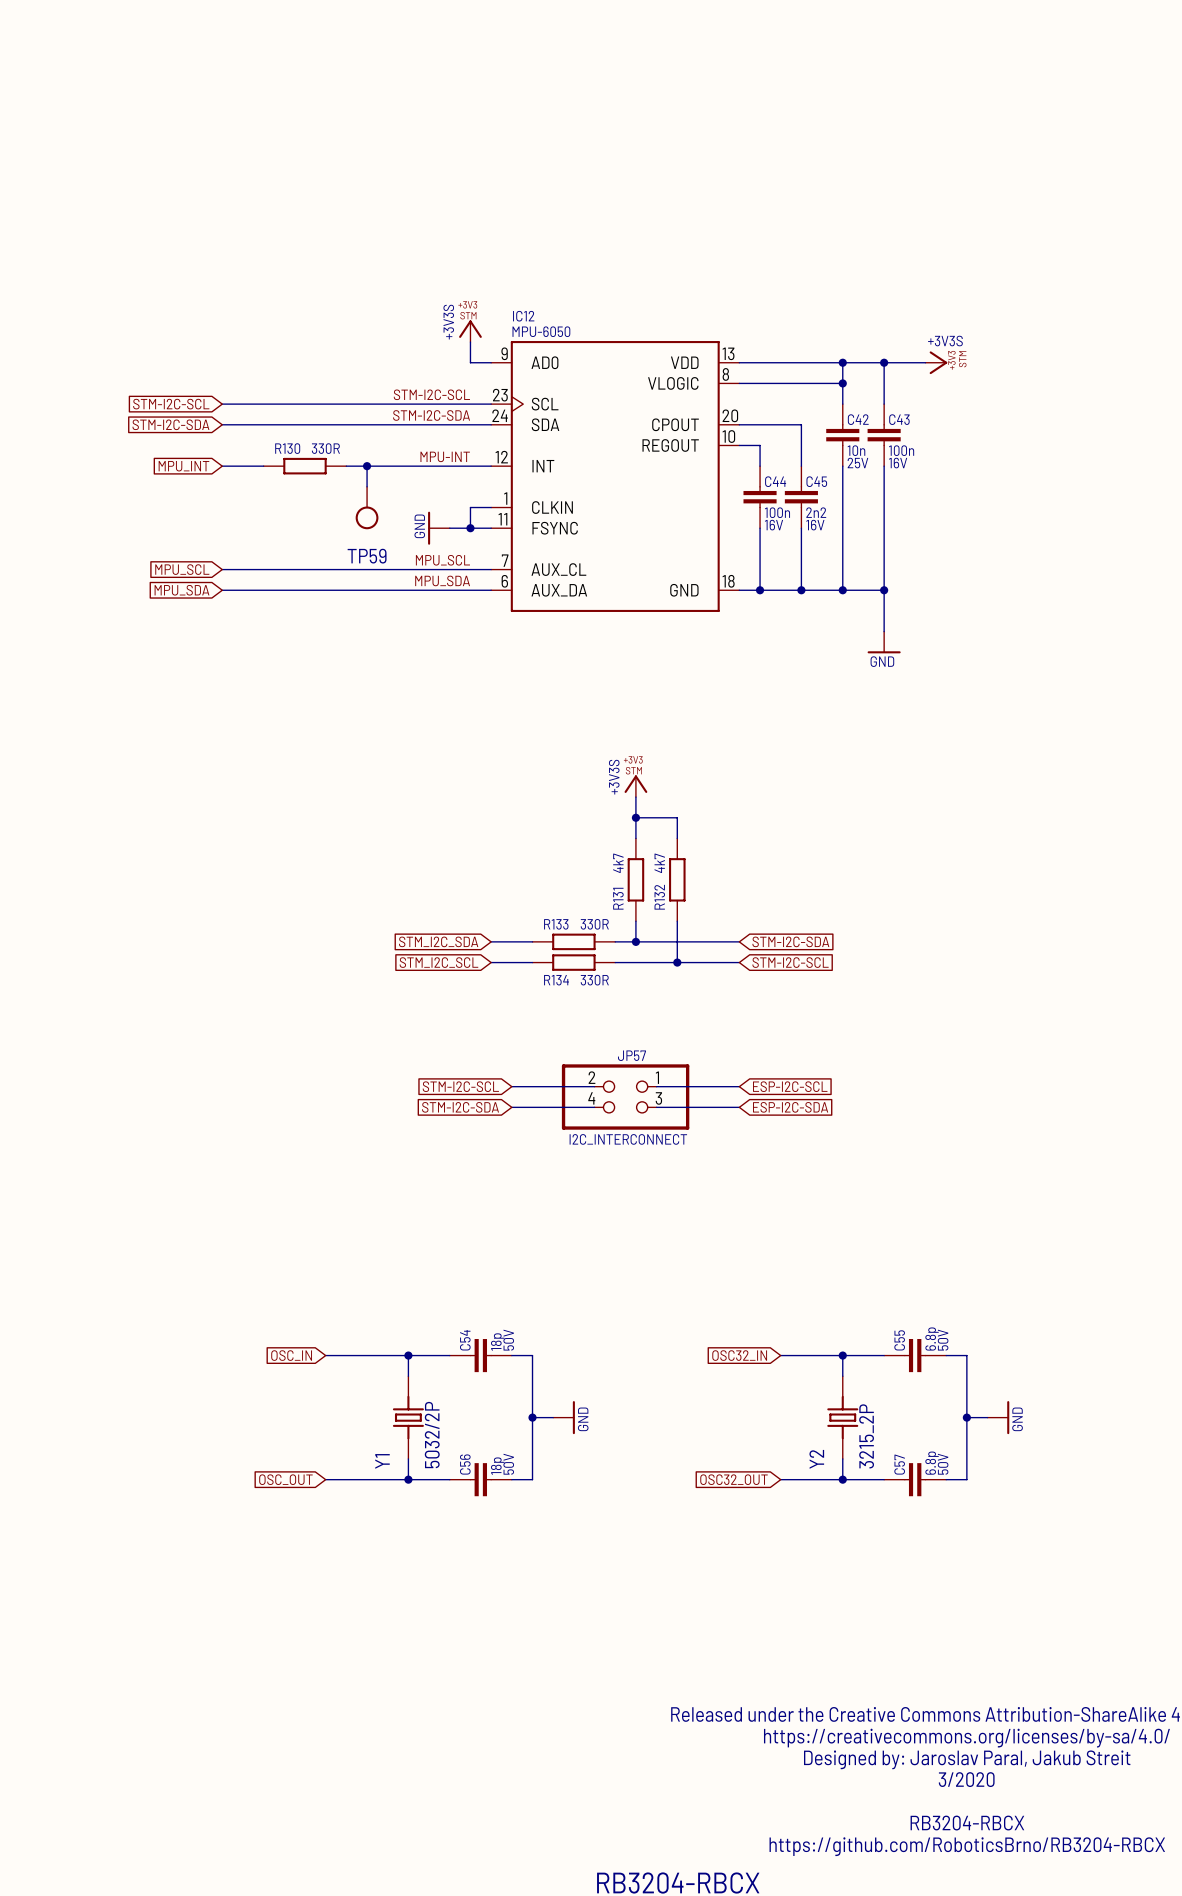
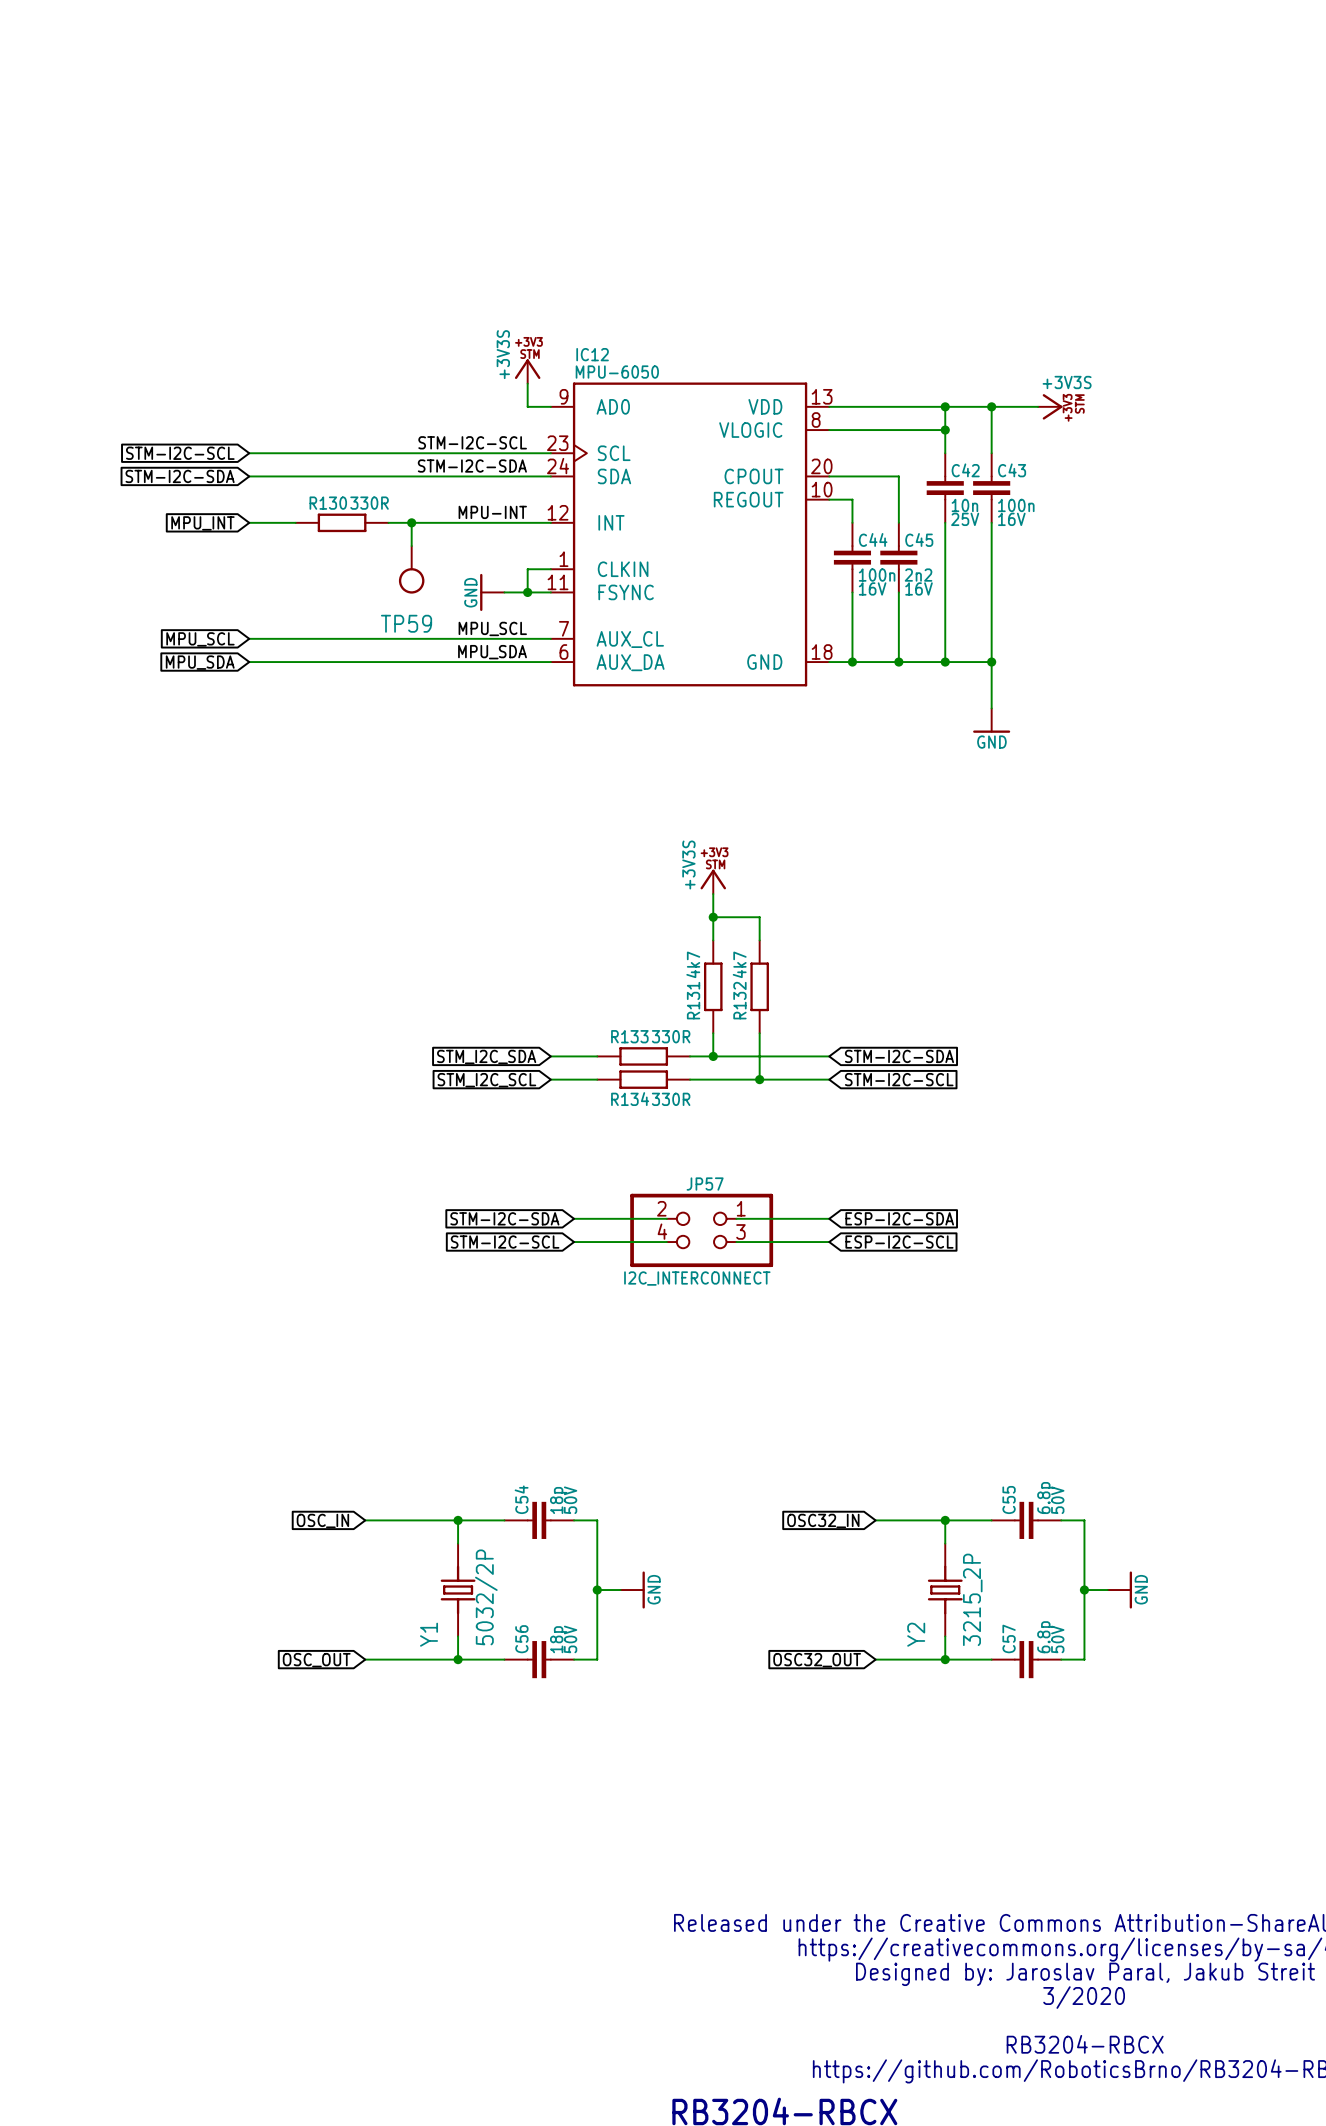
global label: STM-I2C-SCL (460, 1086) -> STM-I2C-SDA (504, 1218)
global label: ESP-I2C-SCL (790, 1086) -> ESP-I2C-SDA (899, 1218)
global label: STM-I2C-SDA (460, 1107) -> STM-I2C-SCL (505, 1242)
global label: ESP-I2C-SDA (790, 1107) -> ESP-I2C-SCL (899, 1242)

